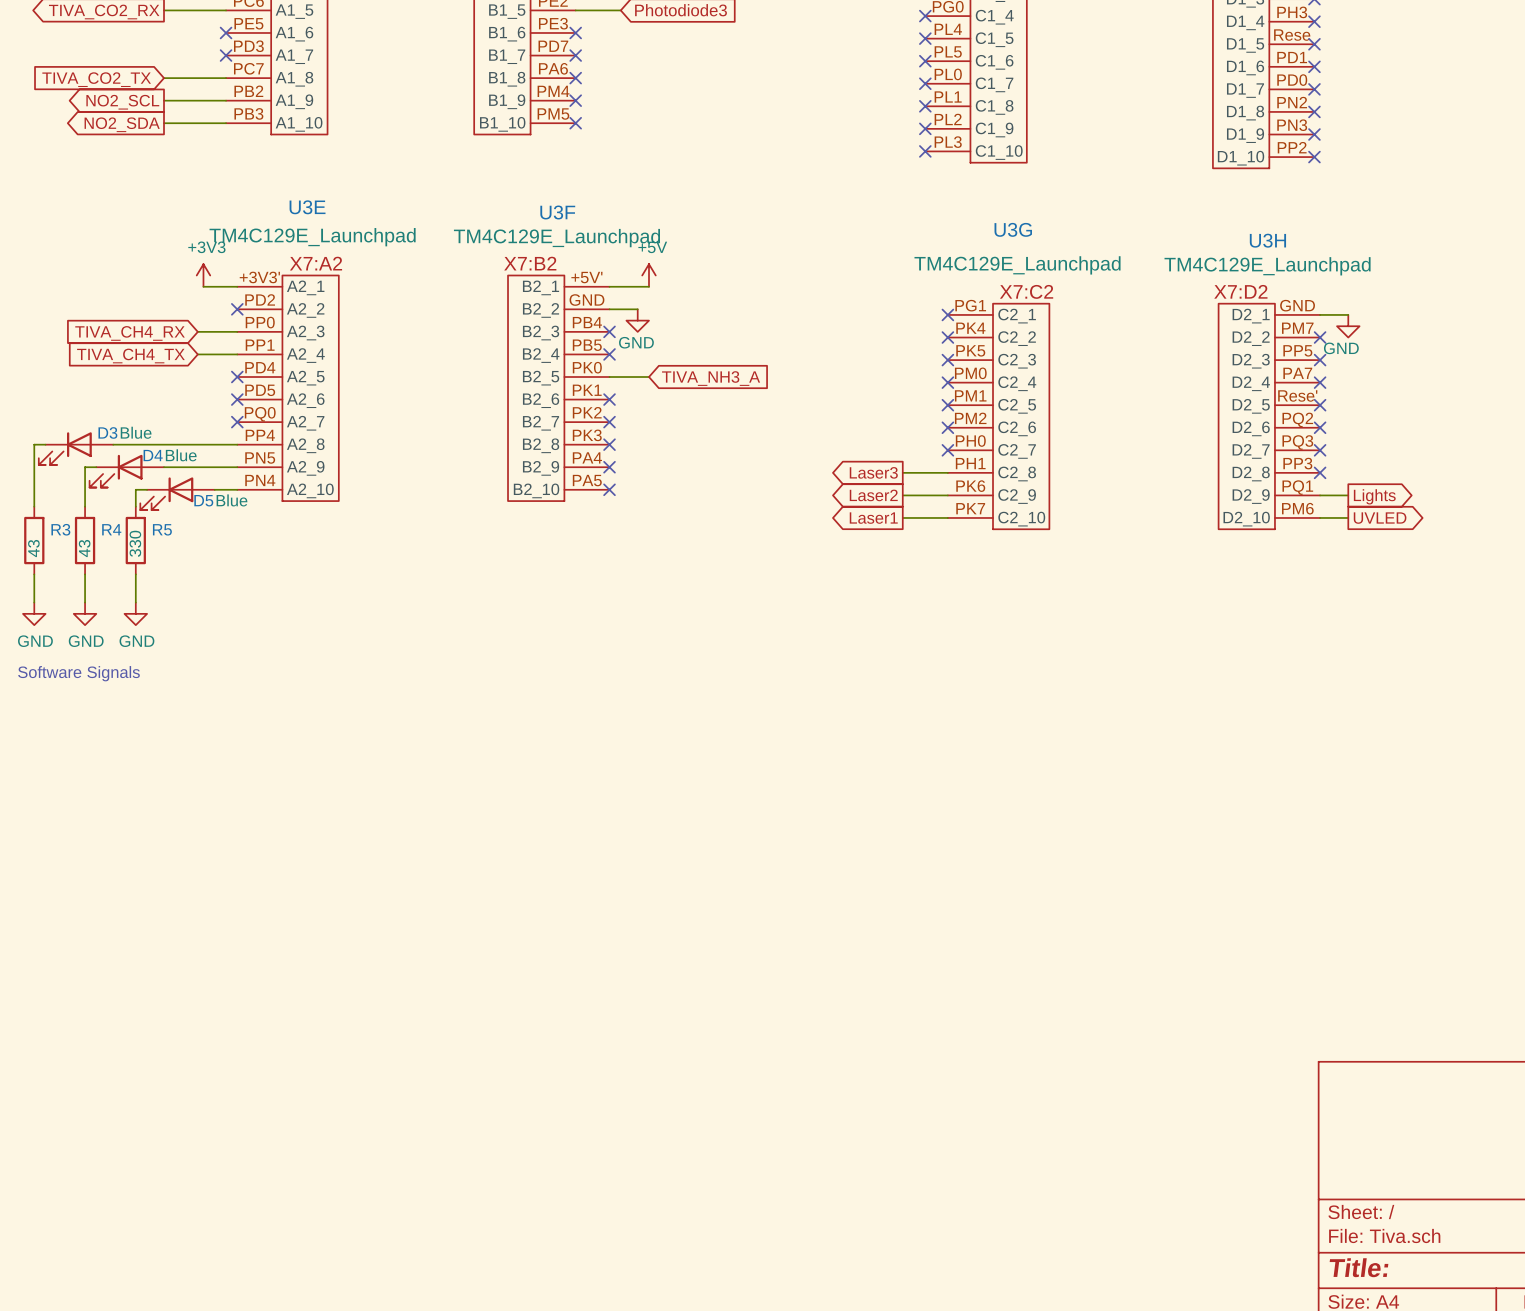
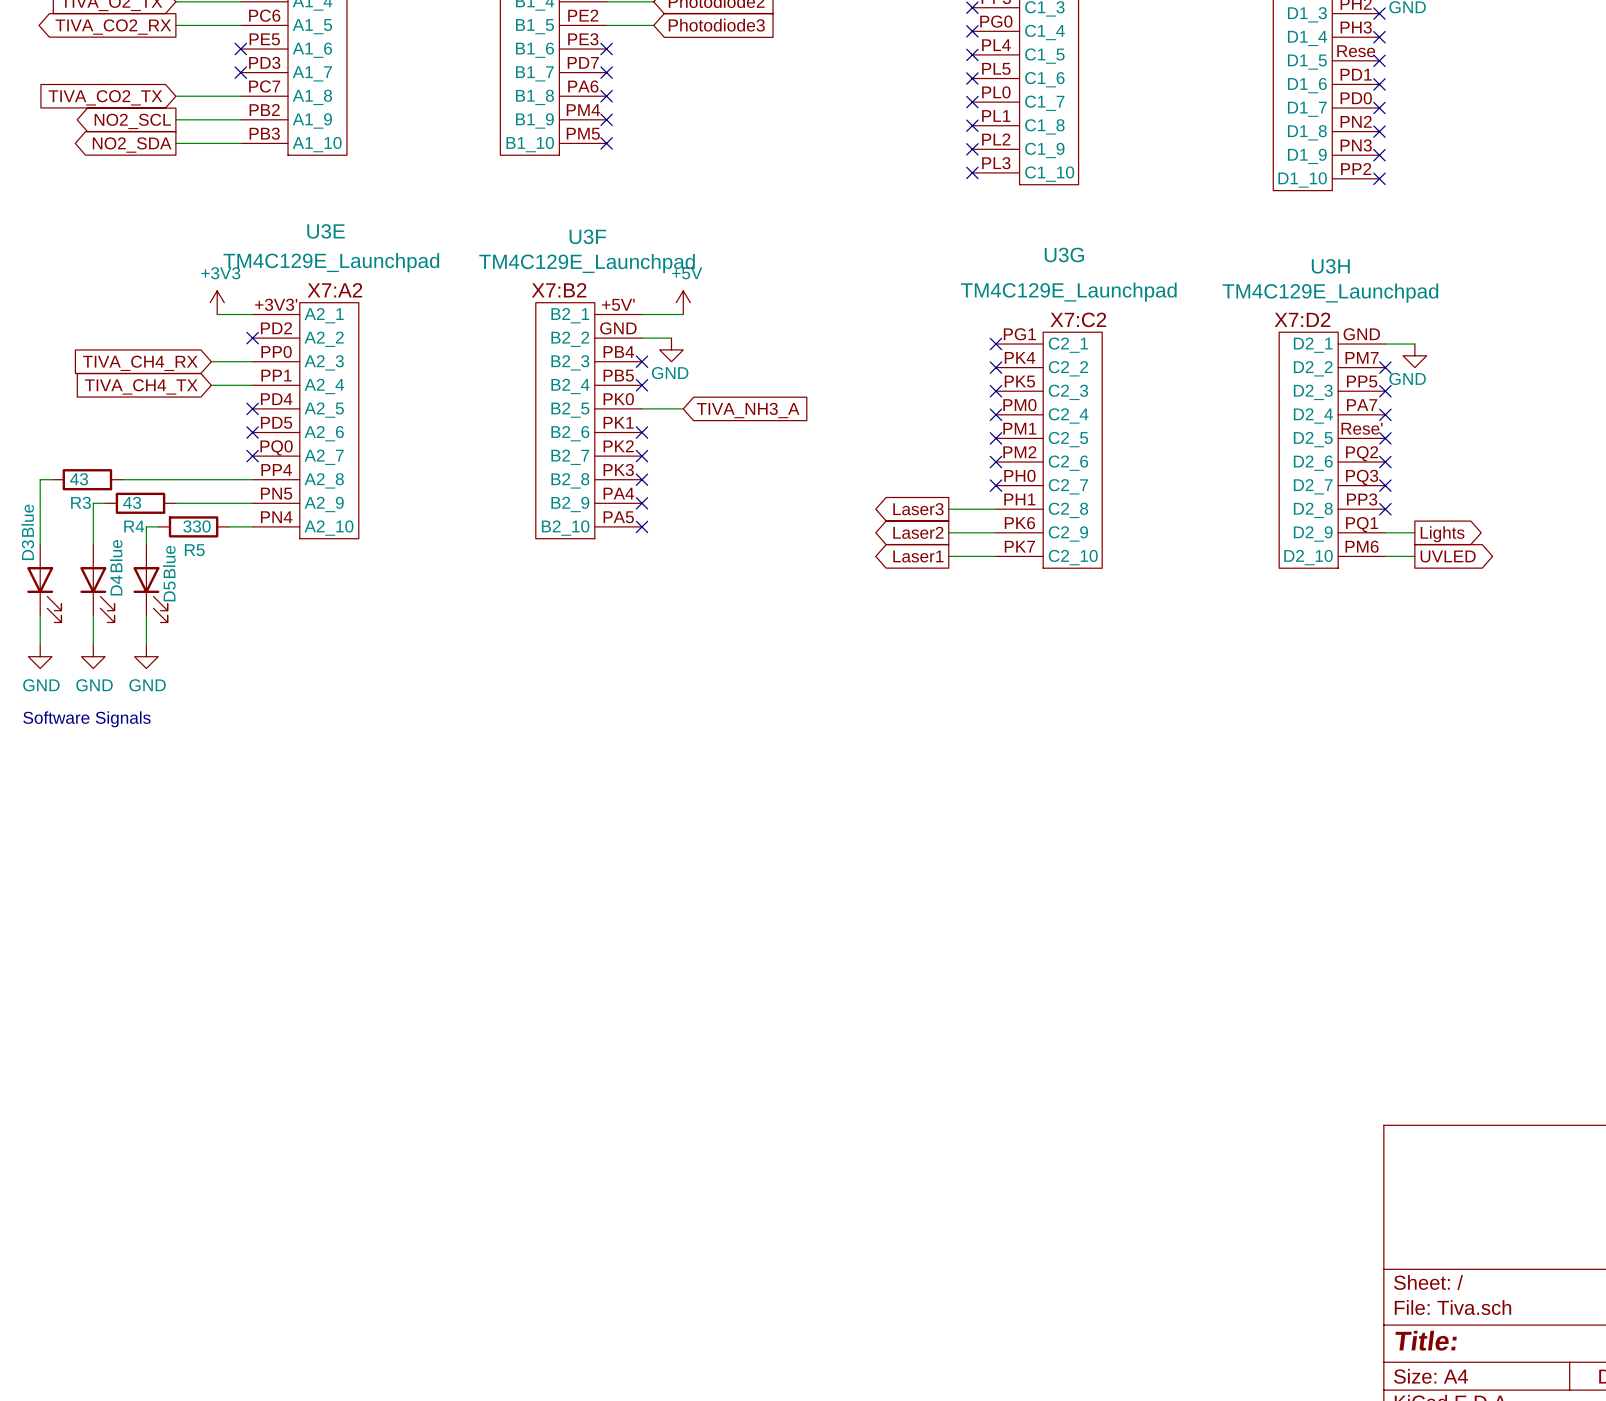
D3 rotation: 0° (65, 448) -> 90° counterclockwise (44, 594)
D3 position: (76, 448) -> (44, 583)
D4 name position: D4 (153, 455) -> D4 (116, 585)
D4 value position: Blue (181, 455) -> Blue (116, 556)
D4 rotation: 0° (116, 471) -> 90° counterclockwise (97, 594)
D4 position: (126, 471) -> (97, 583)
D5 rotation: 0° (166, 493) -> 90° counterclockwise (150, 594)
D5 position: (177, 493) -> (150, 583)
D5 value position: Blue (231, 500) -> Blue (169, 561)
R3 rotation: 0° (34, 540) -> 90° clockwise (87, 479)
R3 position: (34, 540) -> (87, 479)
R4 rotation: 0° (85, 540) -> 90° clockwise (140, 503)
R4 position: (85, 540) -> (140, 503)
R5 rotation: 0° (135, 540) -> 90° clockwise (193, 526)
R5 position: (135, 540) -> (193, 526)

